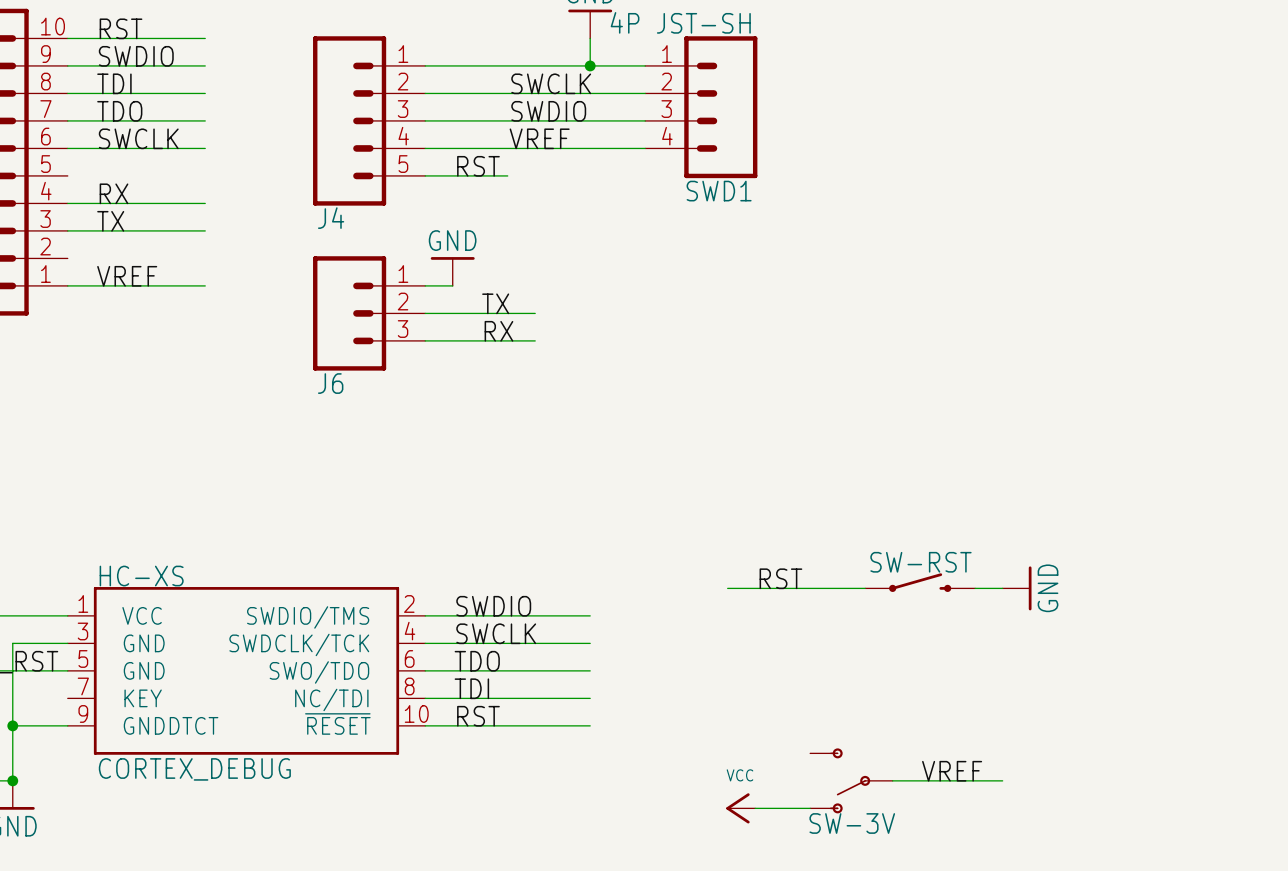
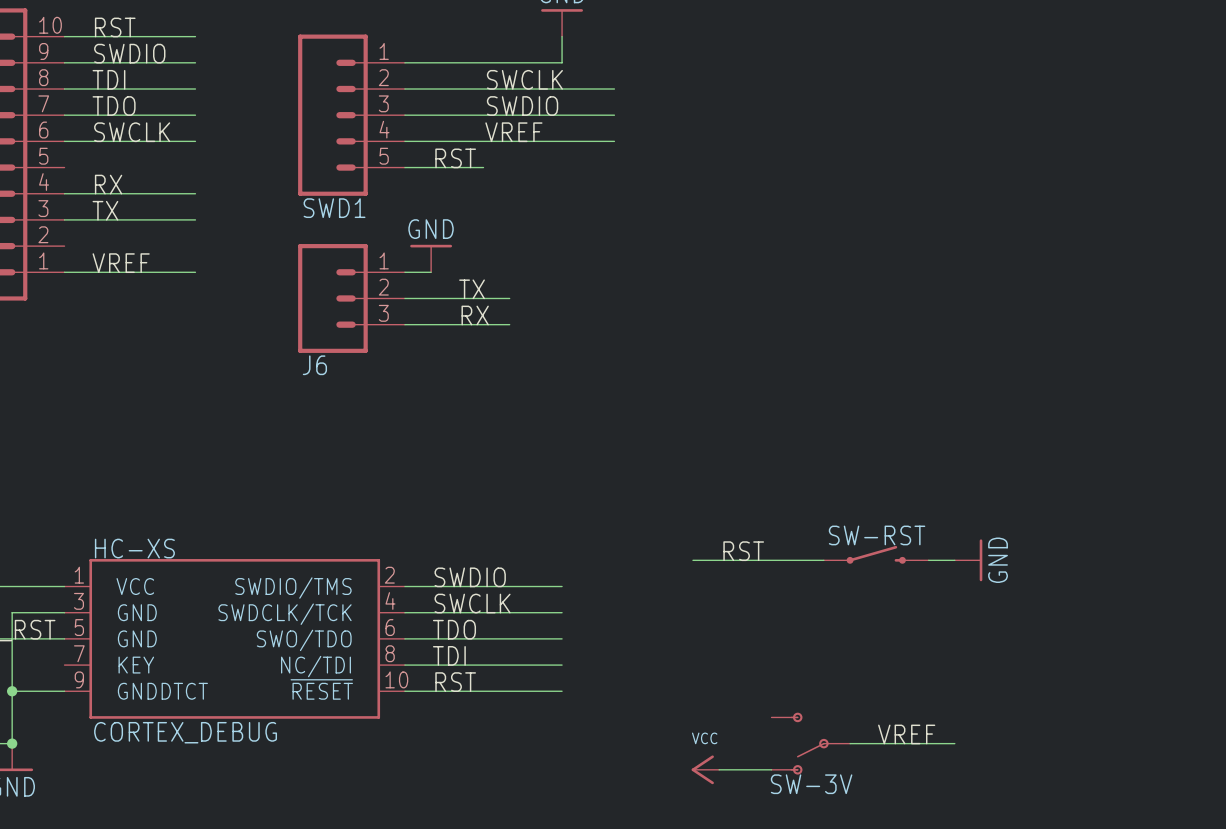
wire: (590, 65) (645, 65) -> none
junction: (590, 65) -> none
SWD1: 4P JST-SH (701, 107) -> none
J4 name: J4 (331, 218) -> SWD1 (334, 208)

